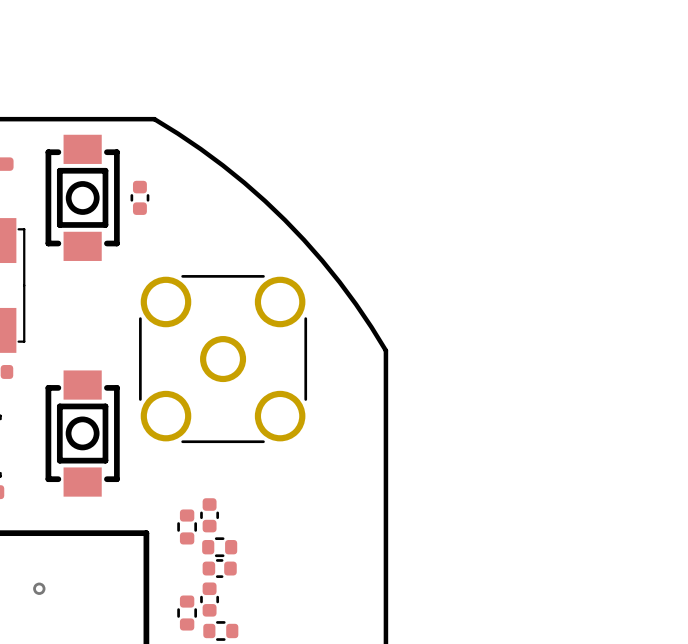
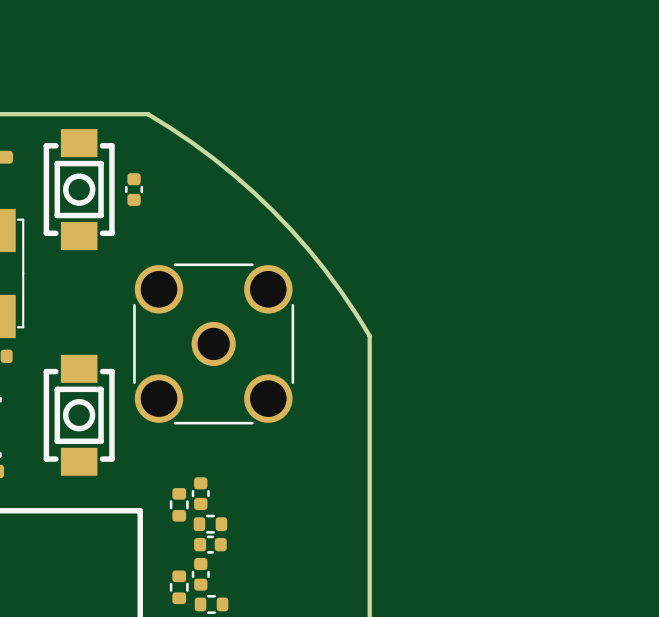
via: (39, 588) -> none

